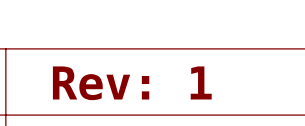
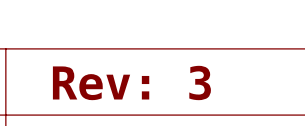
title block: Rev: 1 (132, 83) -> Rev: 3 (131, 82)

